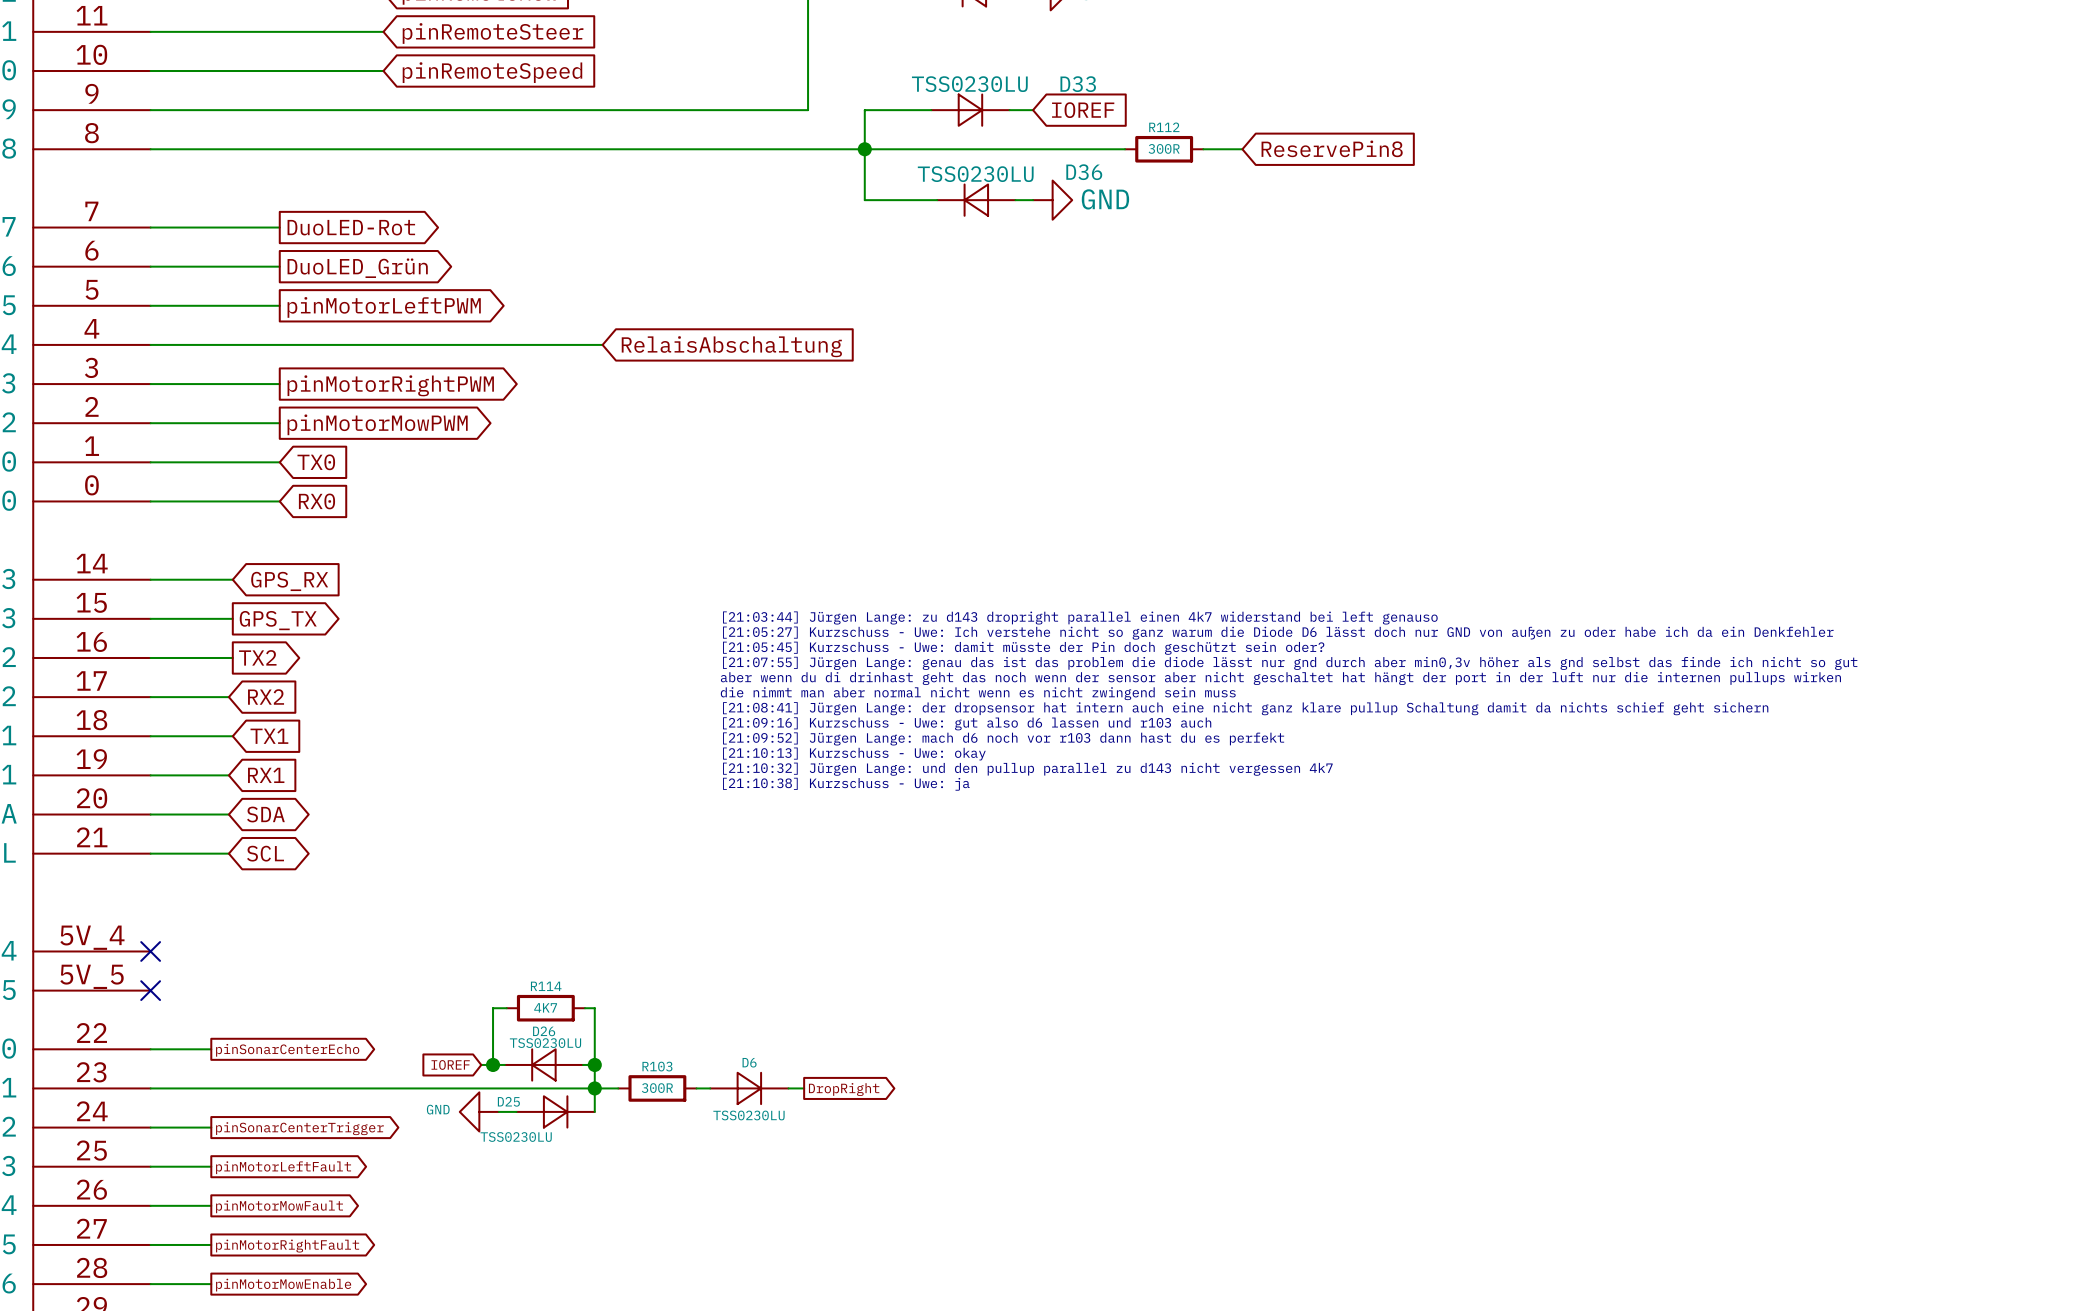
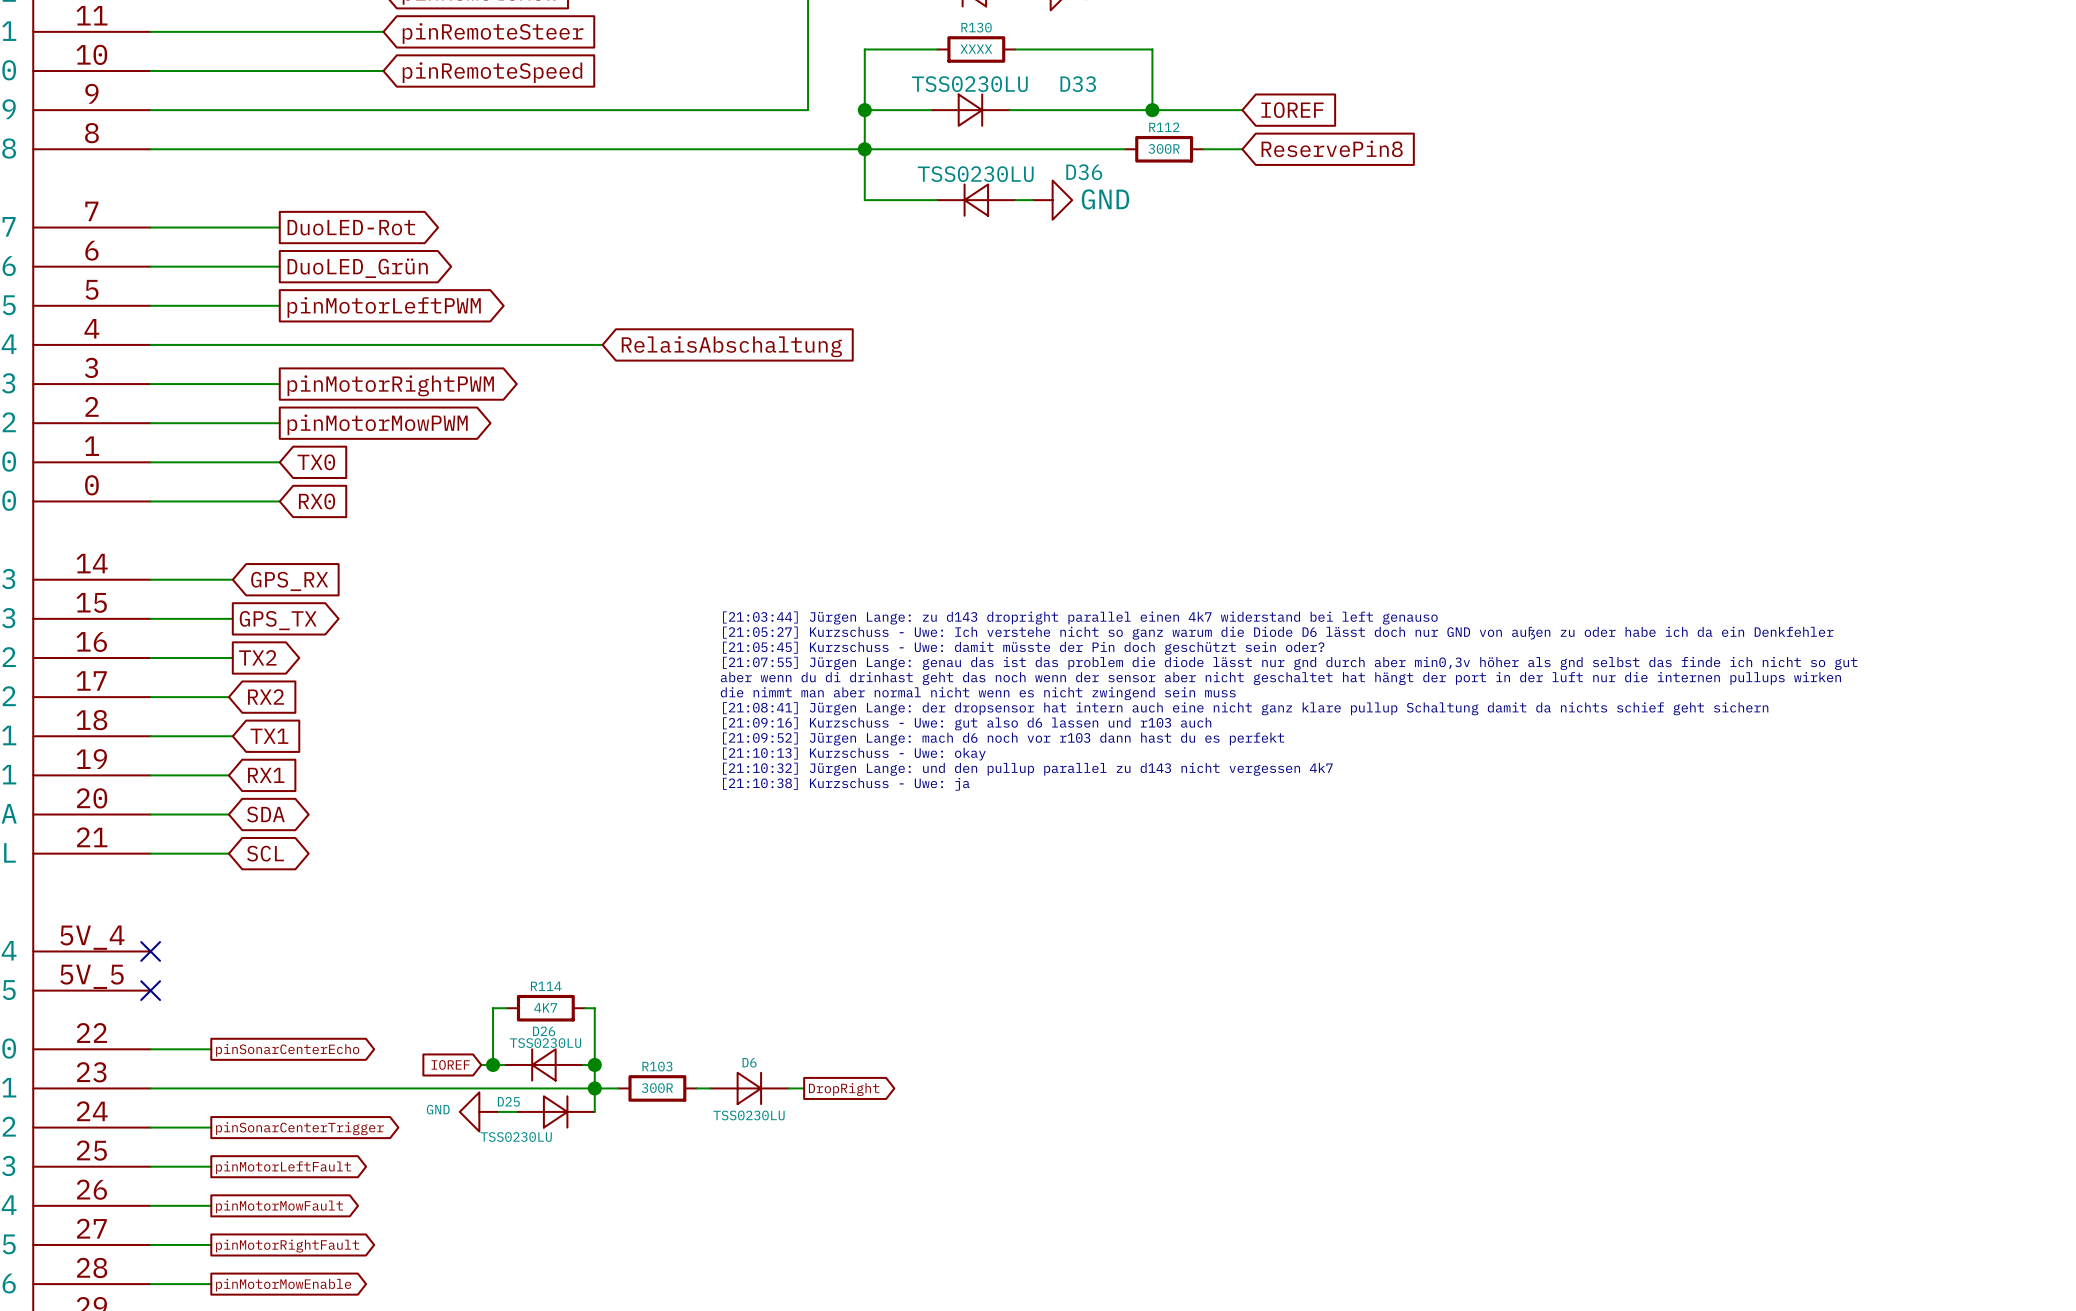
wire: none -> (937, 49) (864, 49) (864, 110)
R130: none -> XXXX (976, 49)
wire: none -> (1015, 49) (1152, 49) (1152, 110)
junction: none -> (864, 110)
wire: none -> (1033, 110) (1242, 110)
global label position: IOREF (1083, 110) -> IOREF (1292, 110)
junction: none -> (1152, 110)

